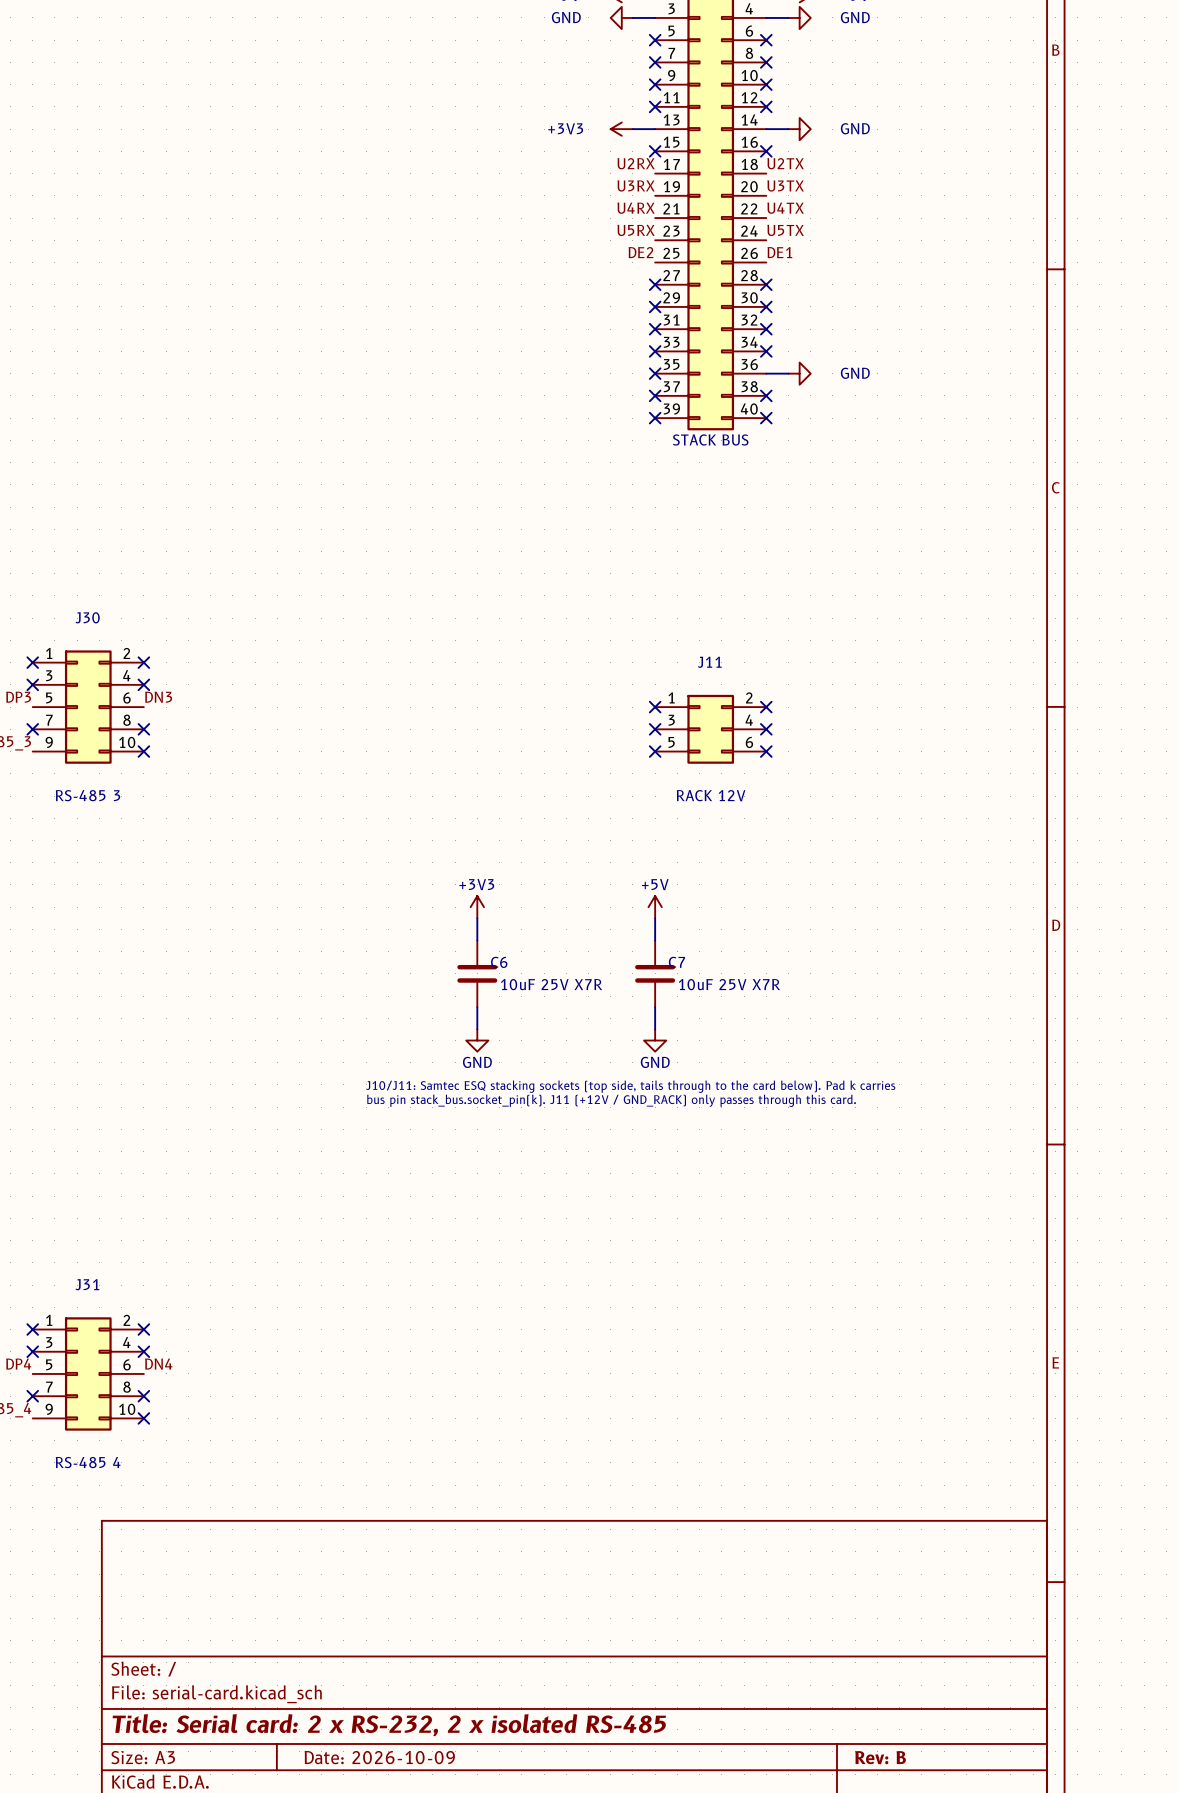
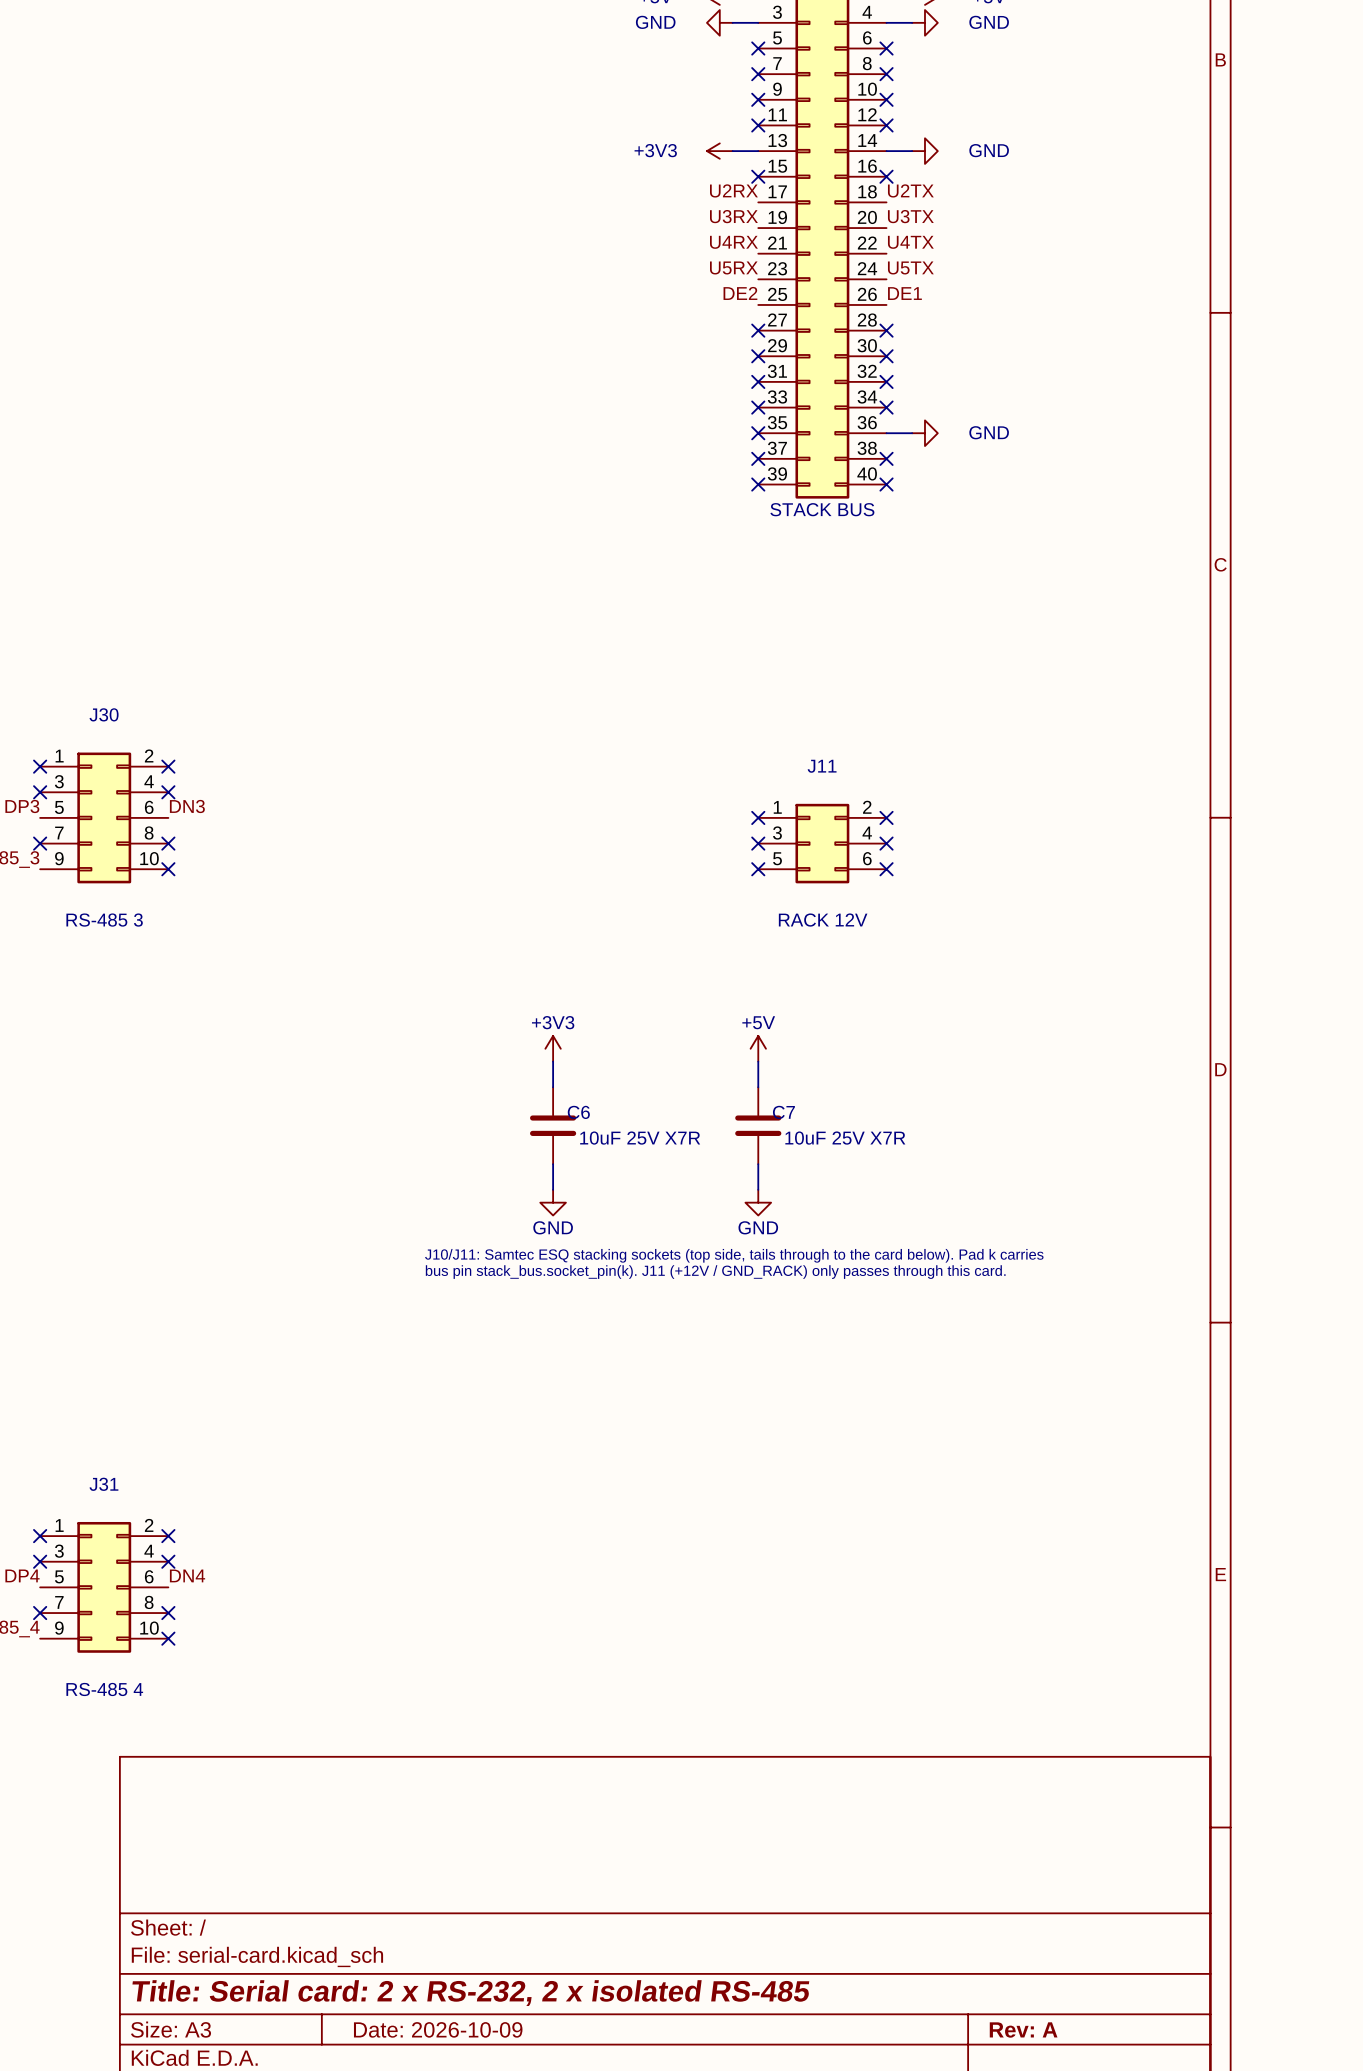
title block: Rev: B (880, 1757) -> Rev: A (1023, 2030)

